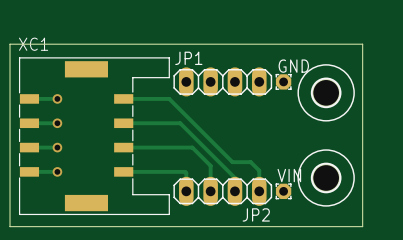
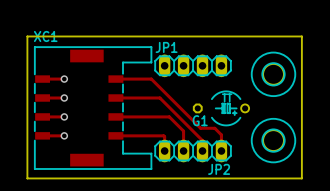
GND: (283, 81) -> none
G1: none -> (221, 108)
VIN: (283, 191) -> none

